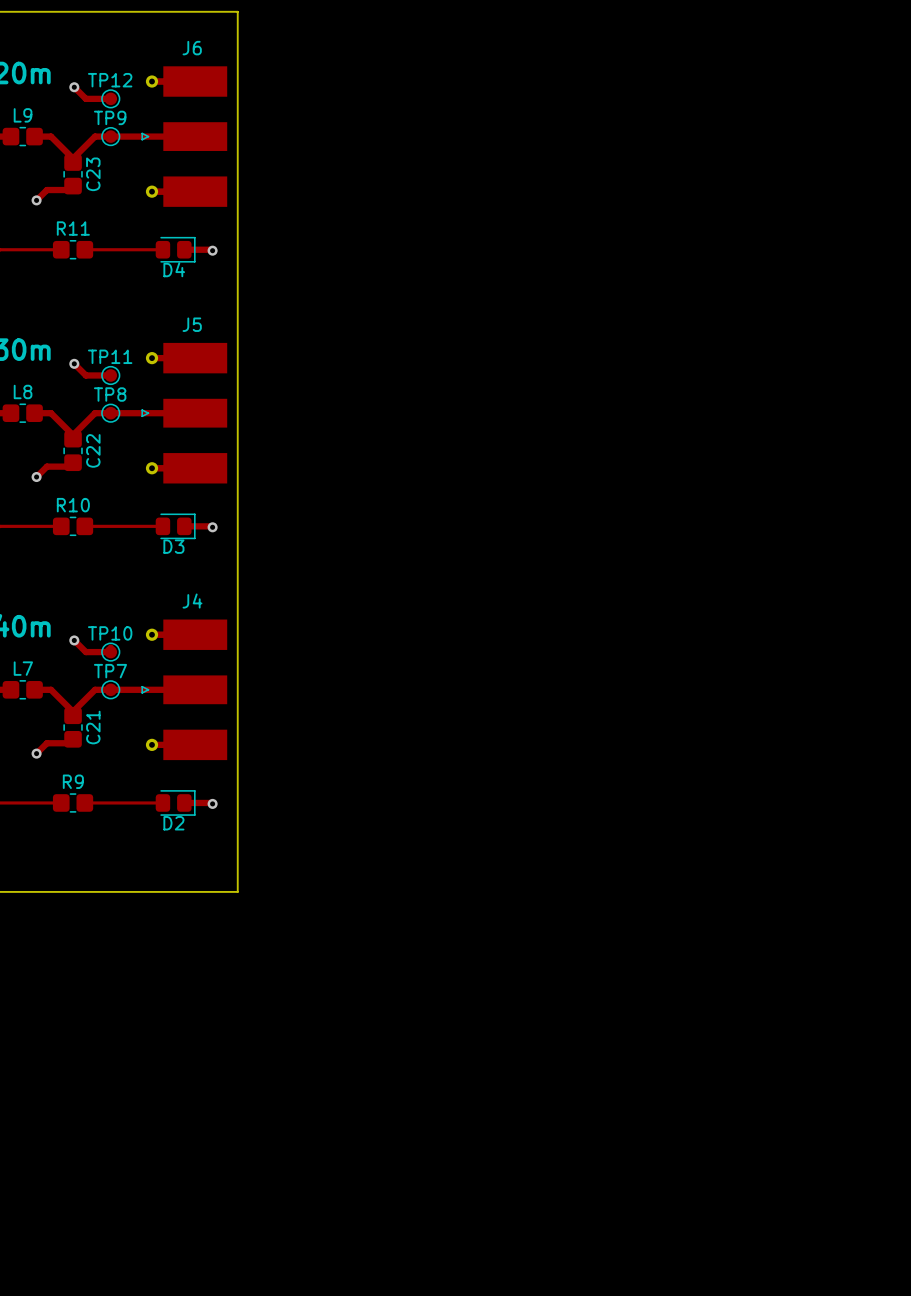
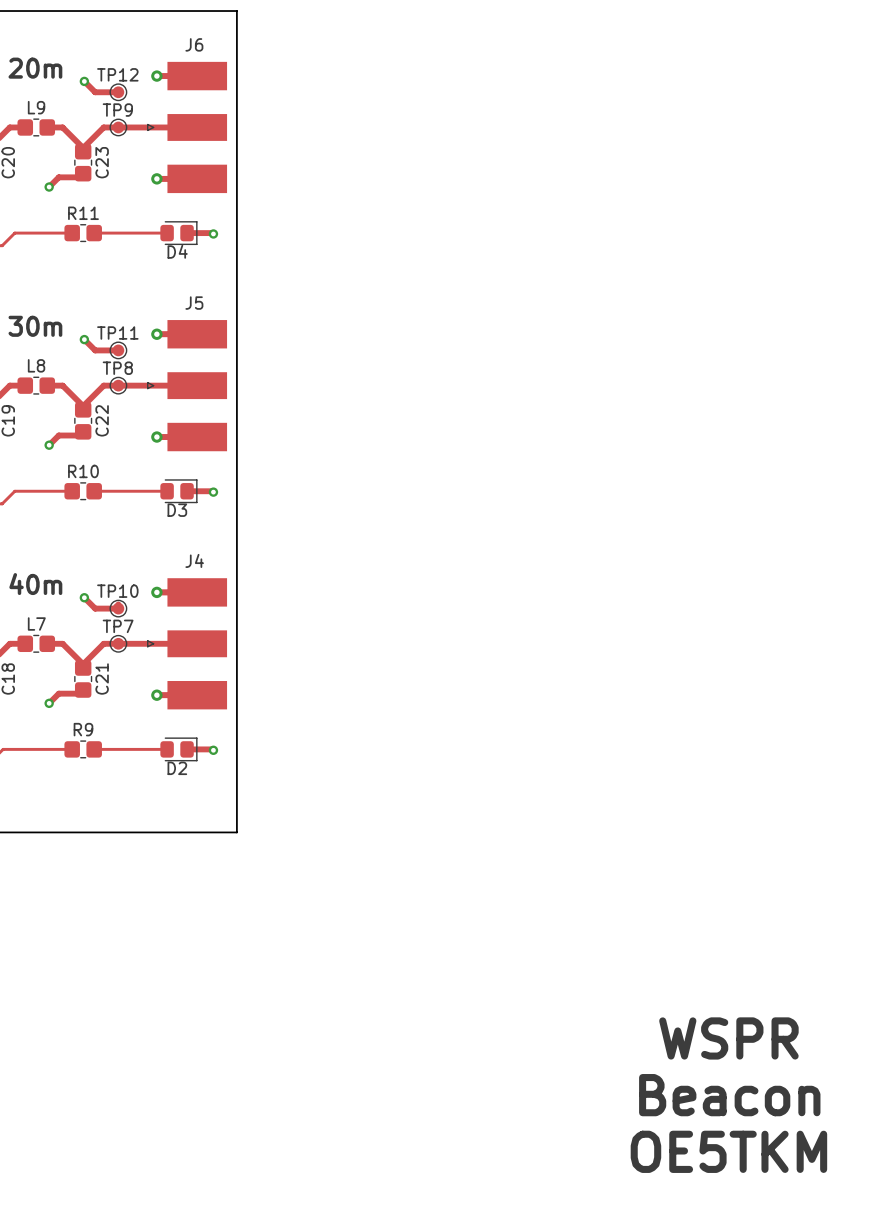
text: none -> WSPR (728, 1038)
text: none -> Beacon (729, 1095)
text: none -> OE5TKM (728, 1151)

